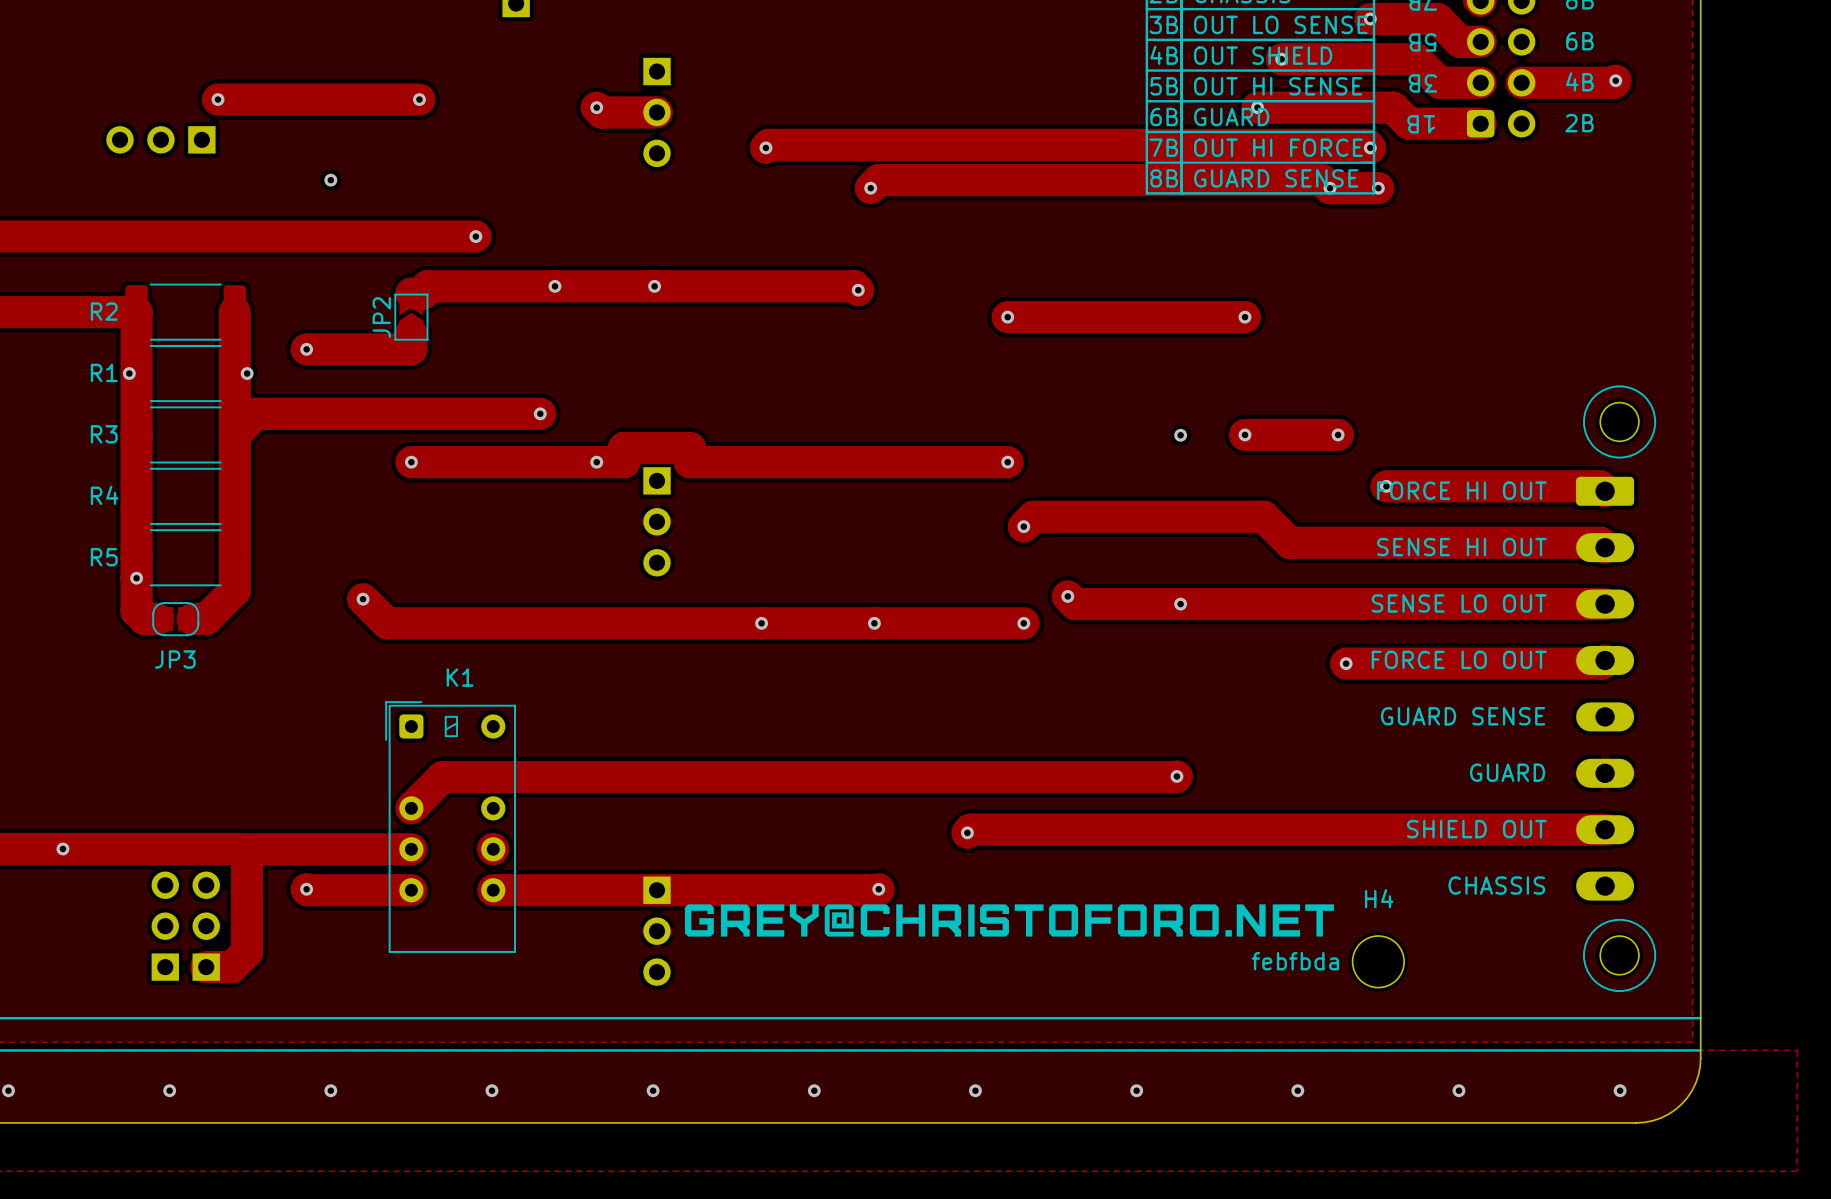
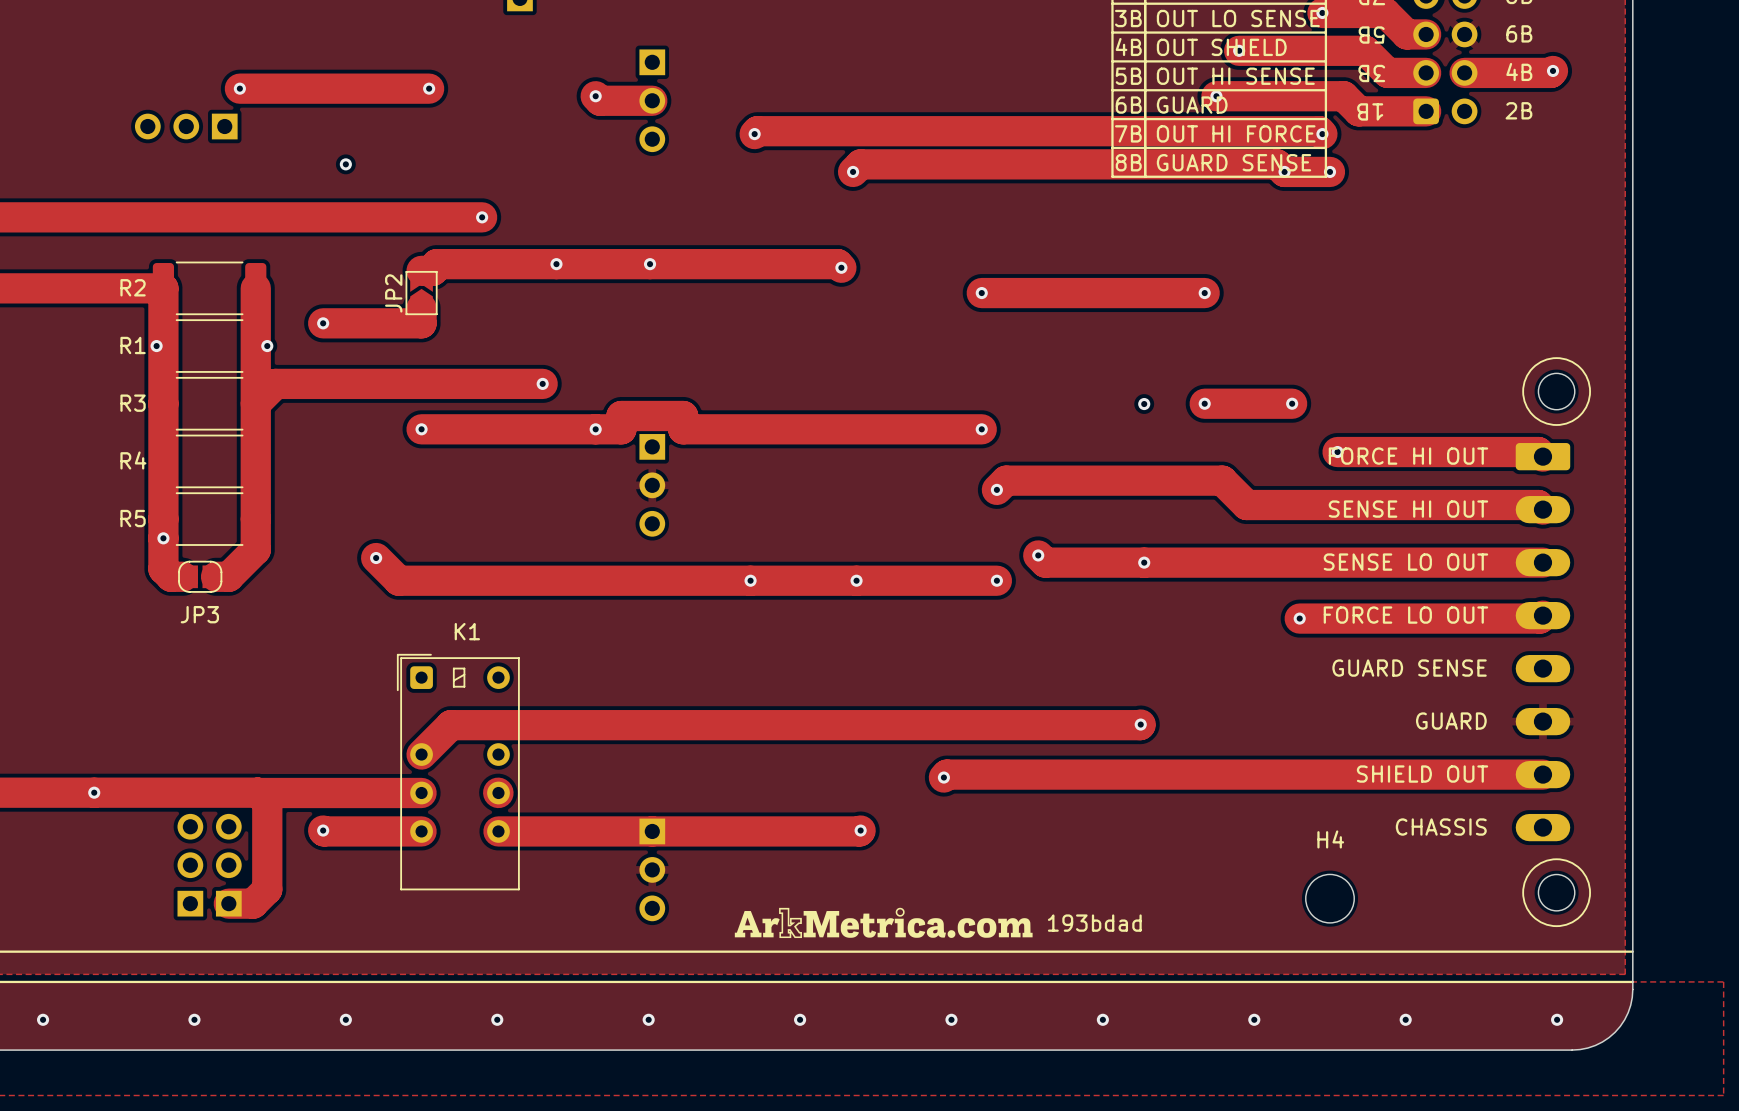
drawing: [684, 904, 1335, 937] -> none
text: febfbda (1295, 961) -> none
drawing: none -> [734, 907, 1033, 939]
text: none -> 193bdad (1094, 923)

